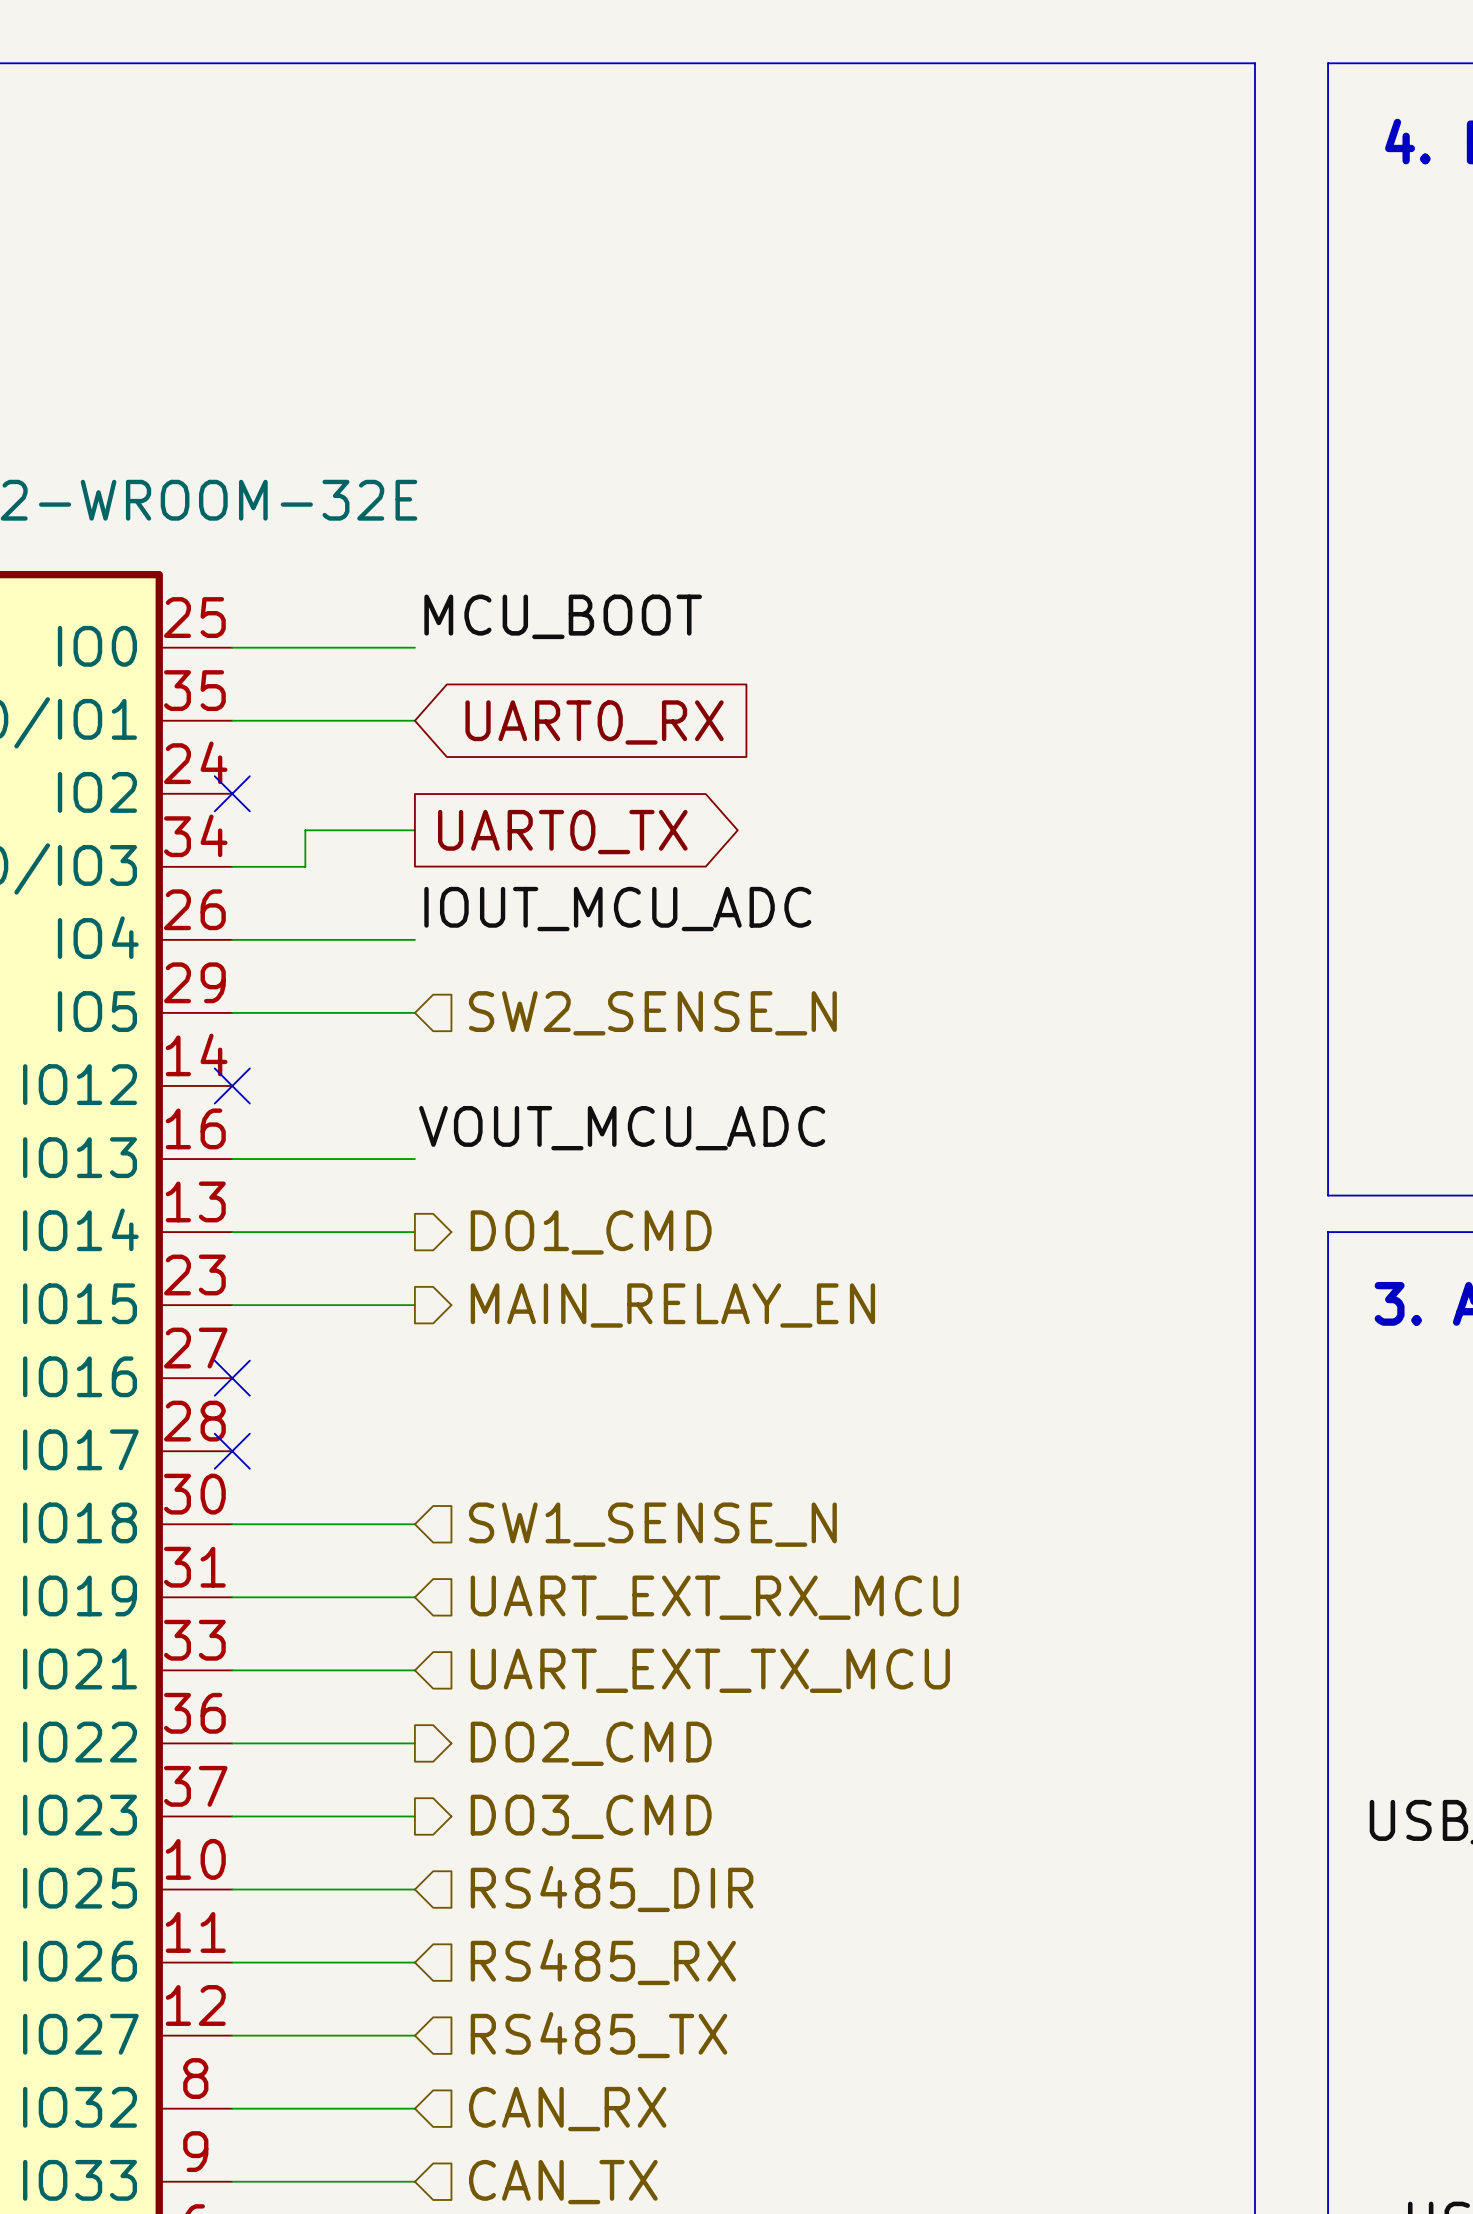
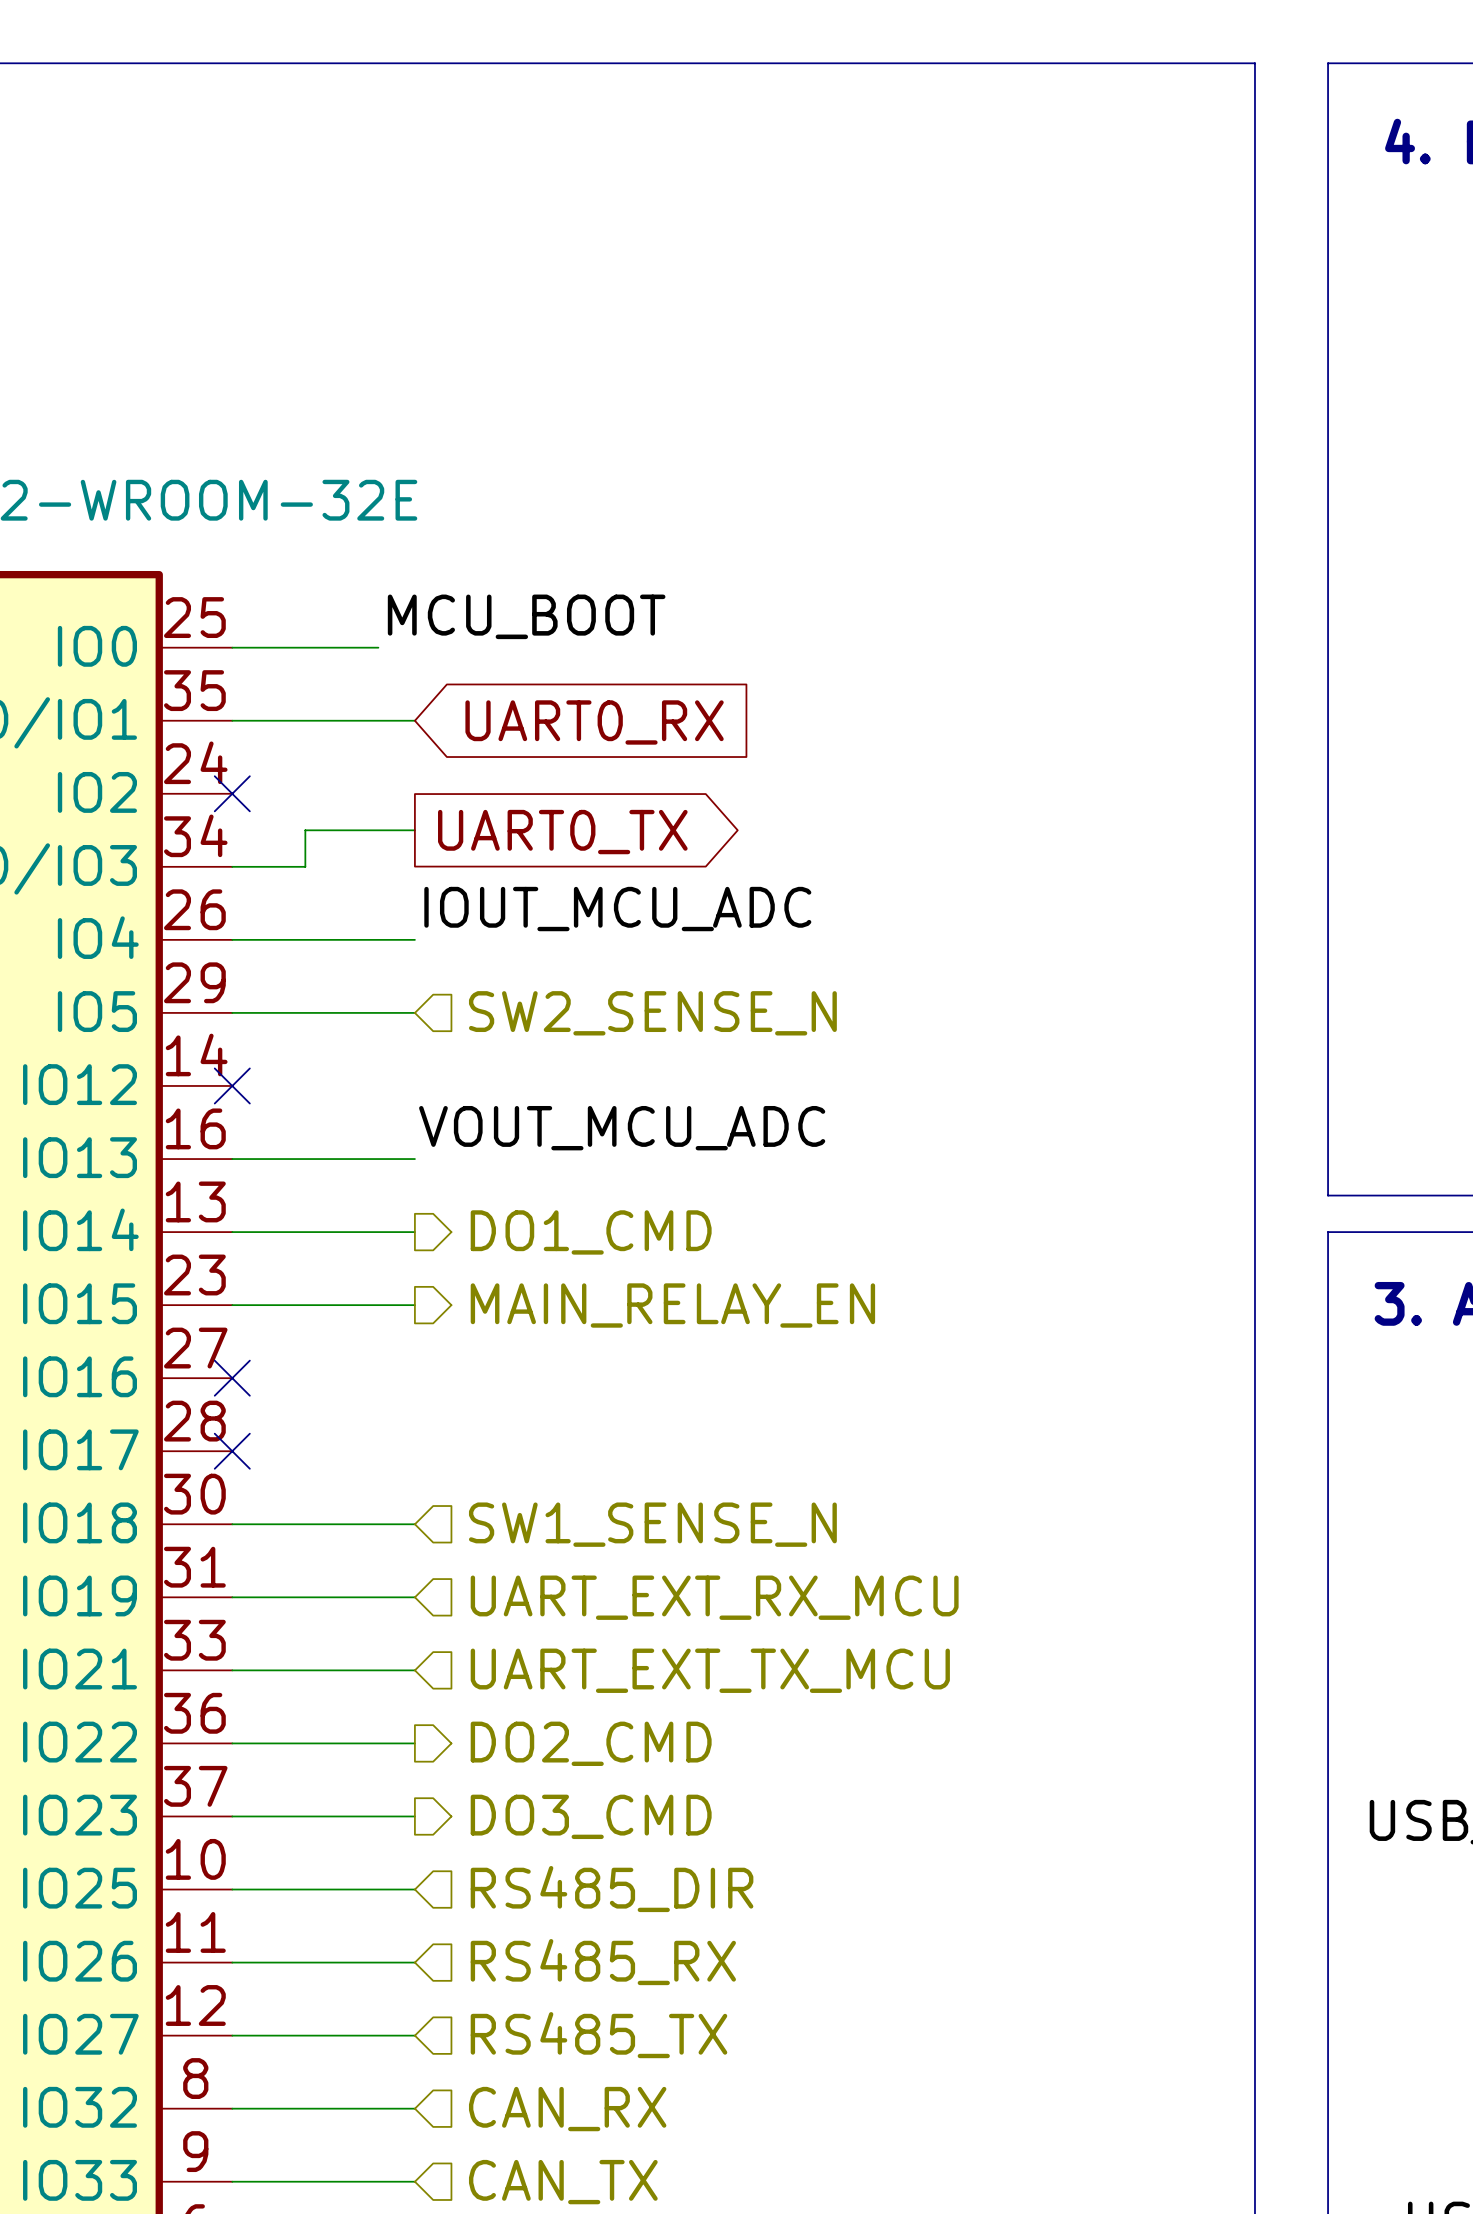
label position: MCU_BOOT (563, 616) -> MCU_BOOT (526, 616)
wire: (378, 647) (414, 647) -> none

